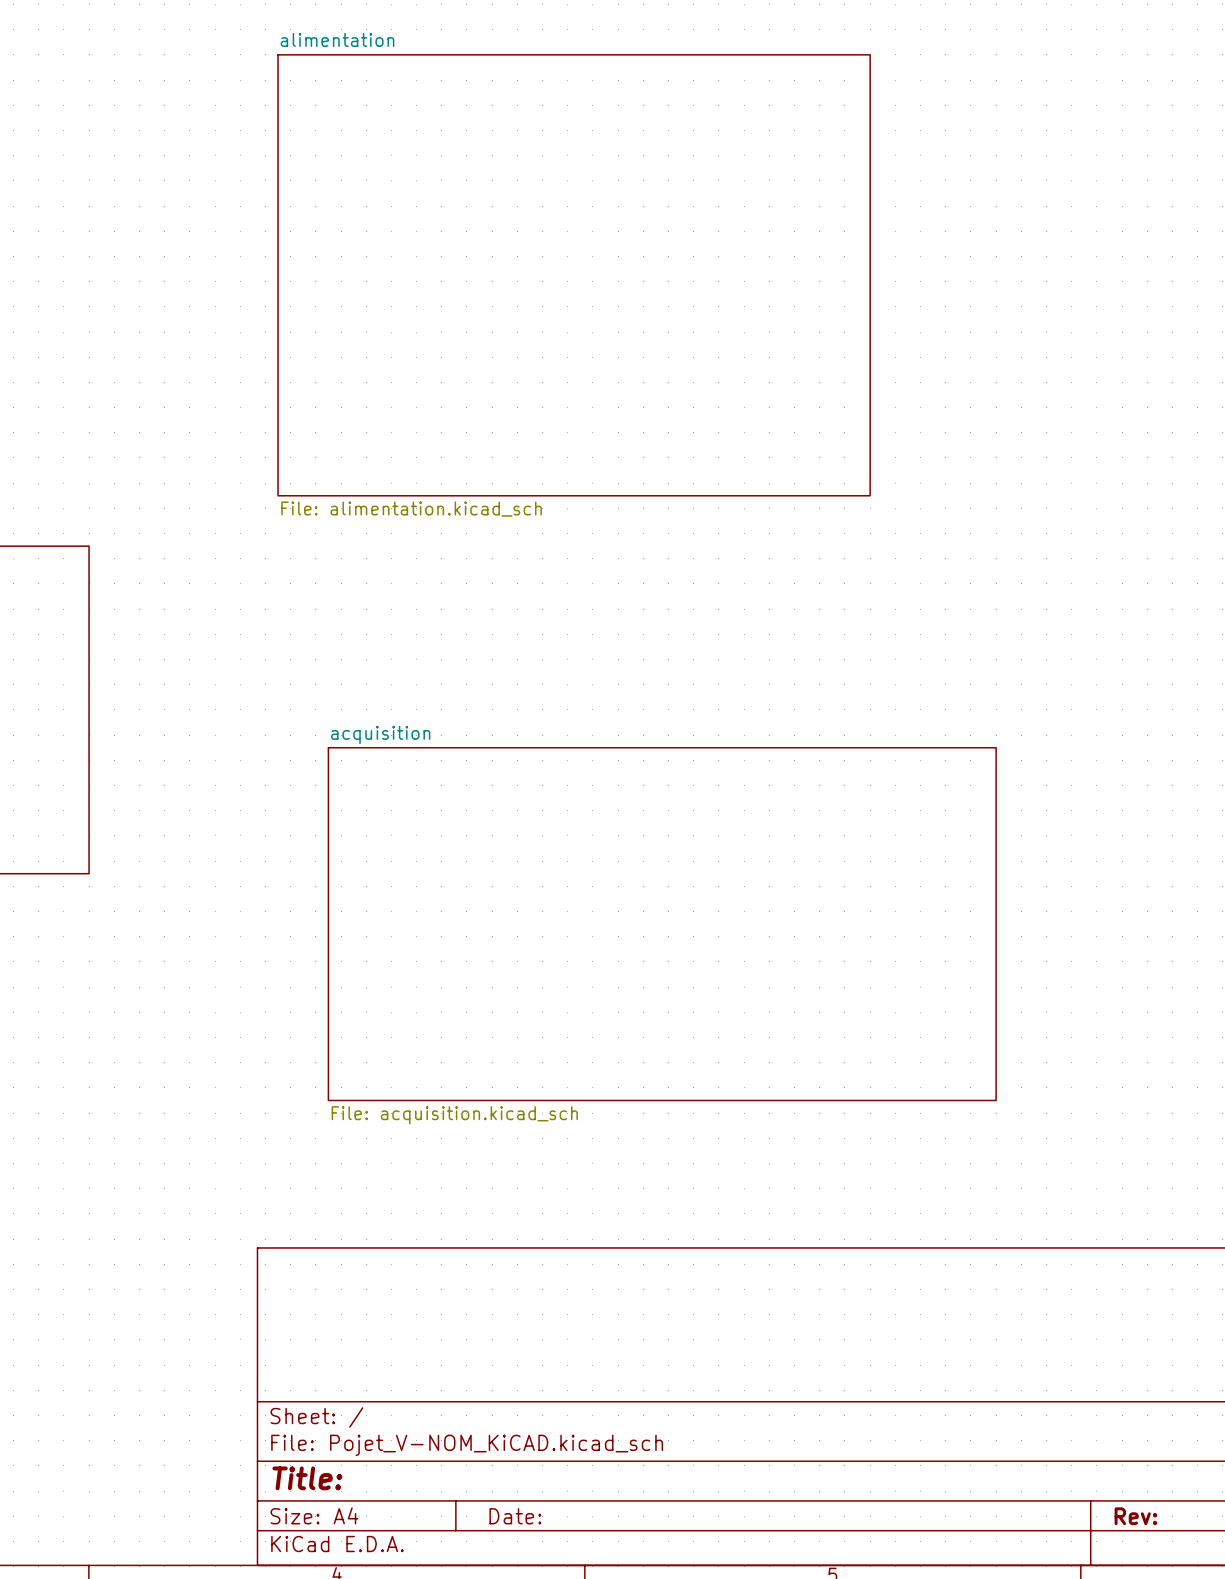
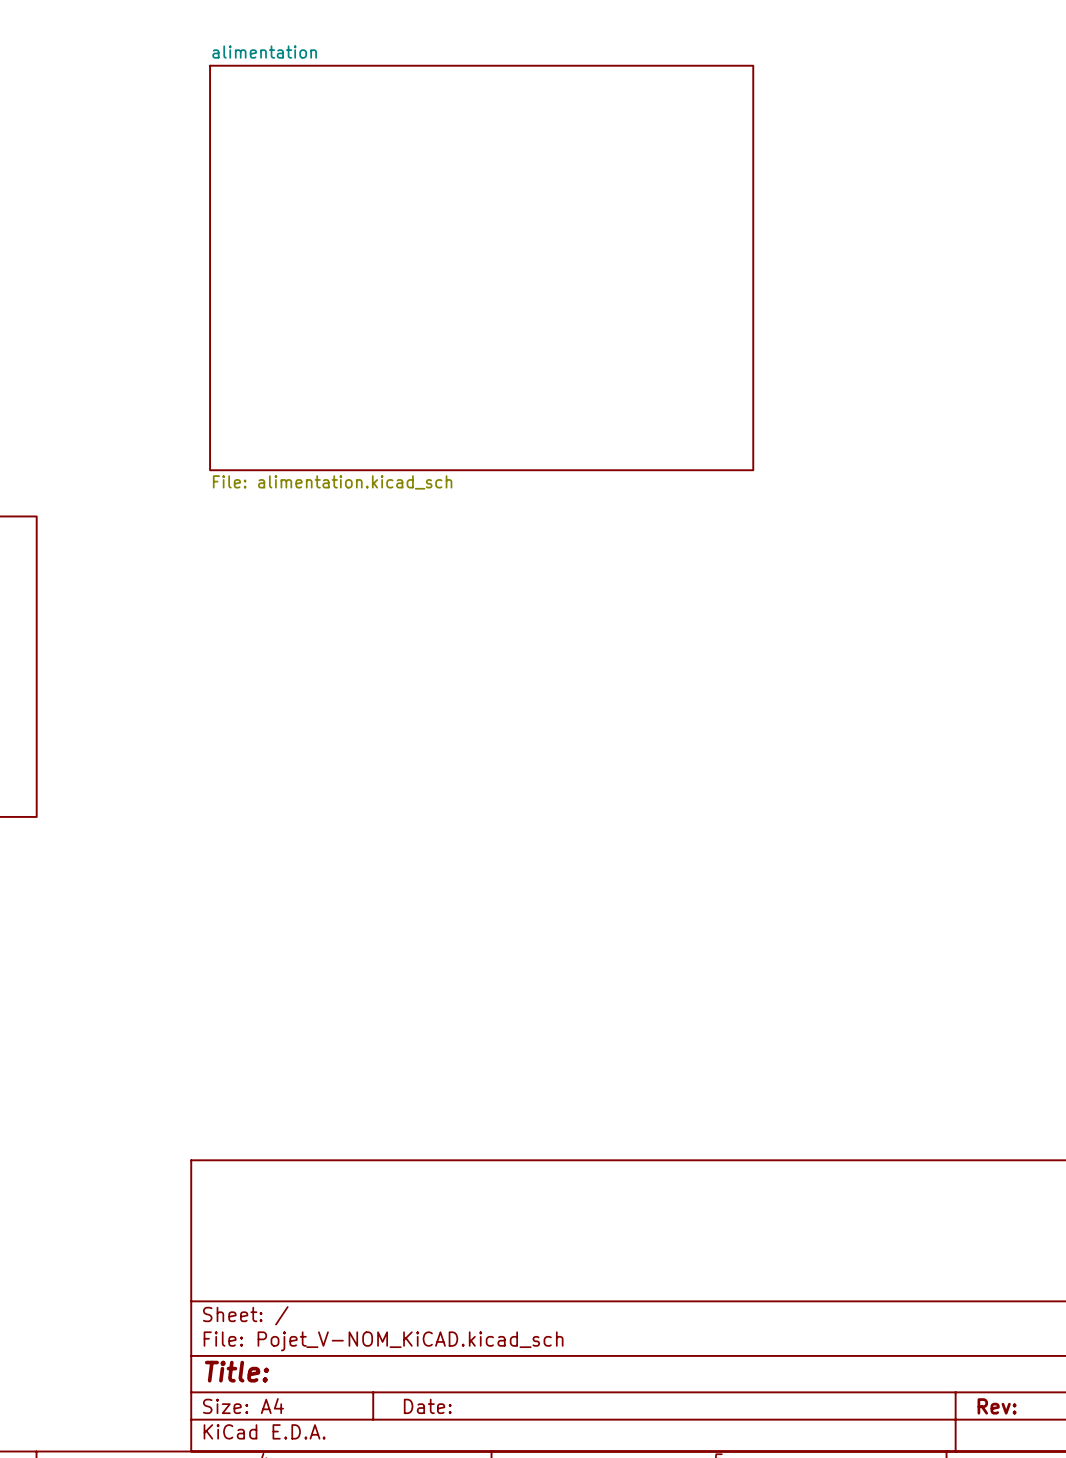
sheet acquisition: File: acquisition.kicad_sch (662, 924) -> none

